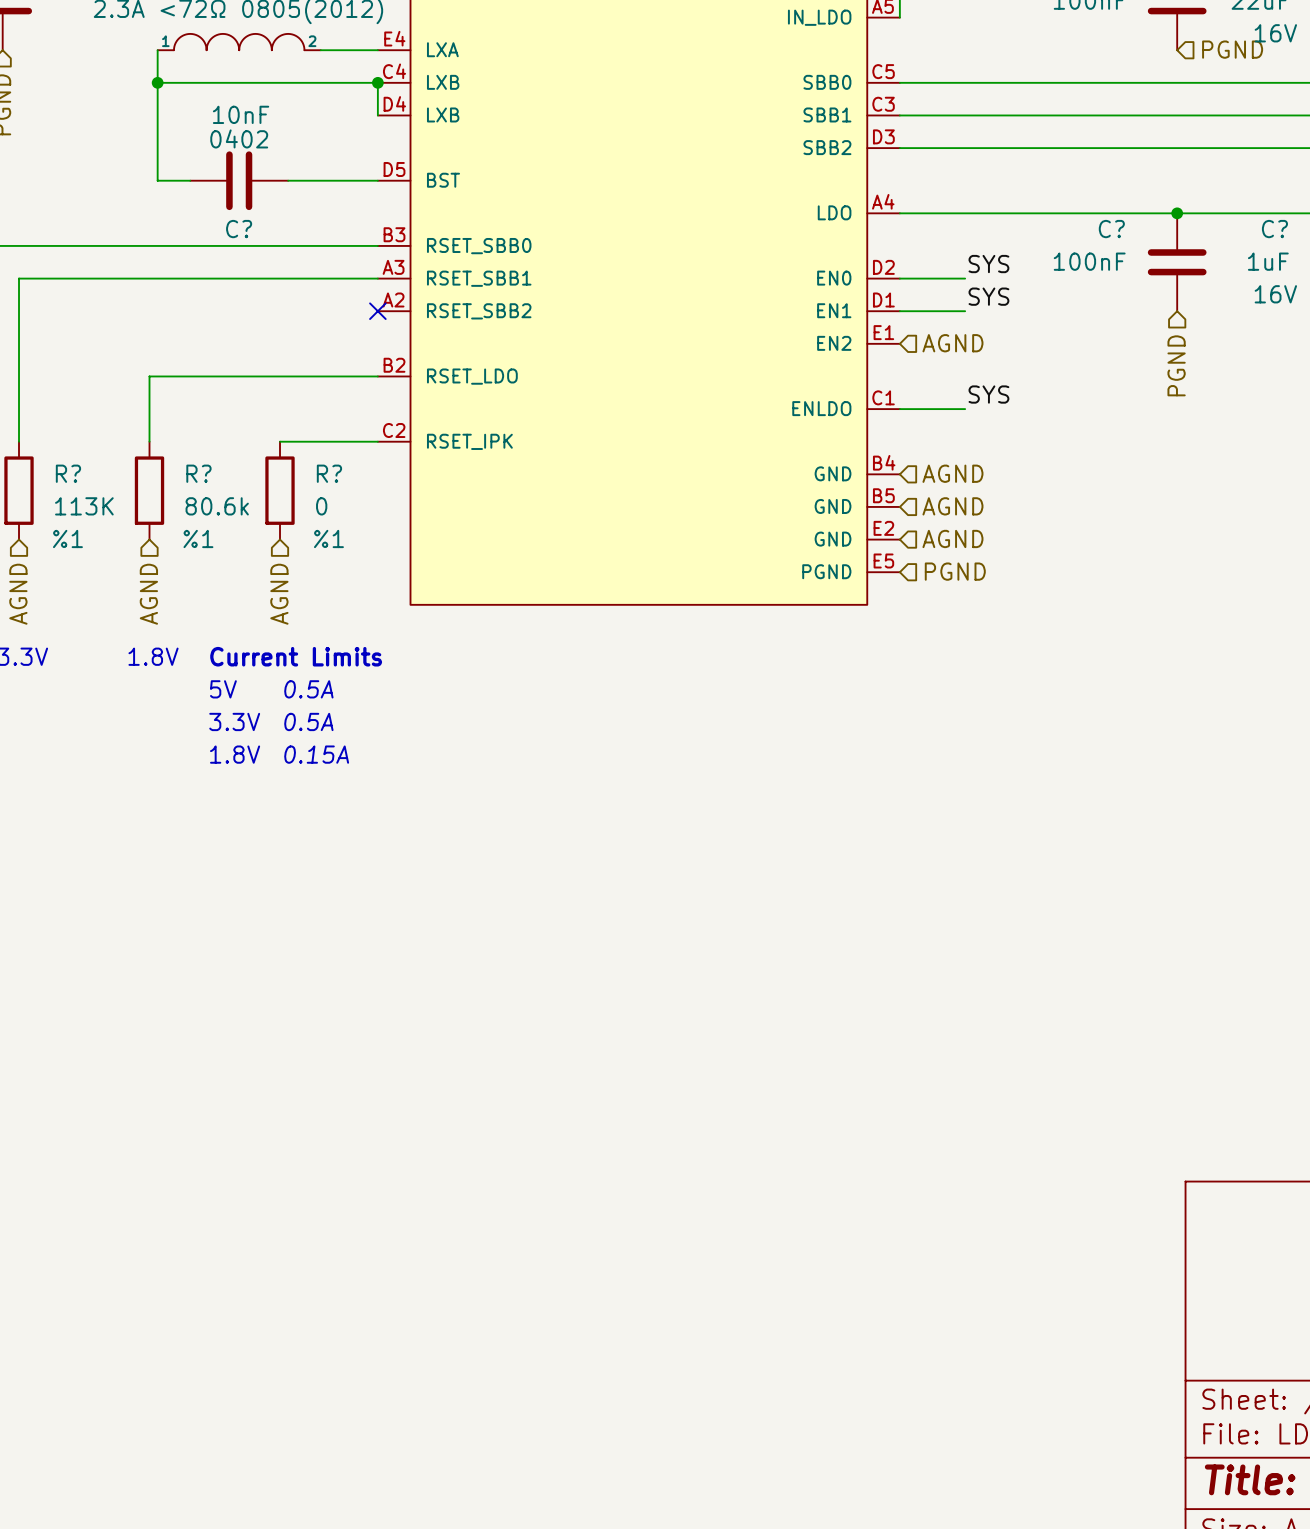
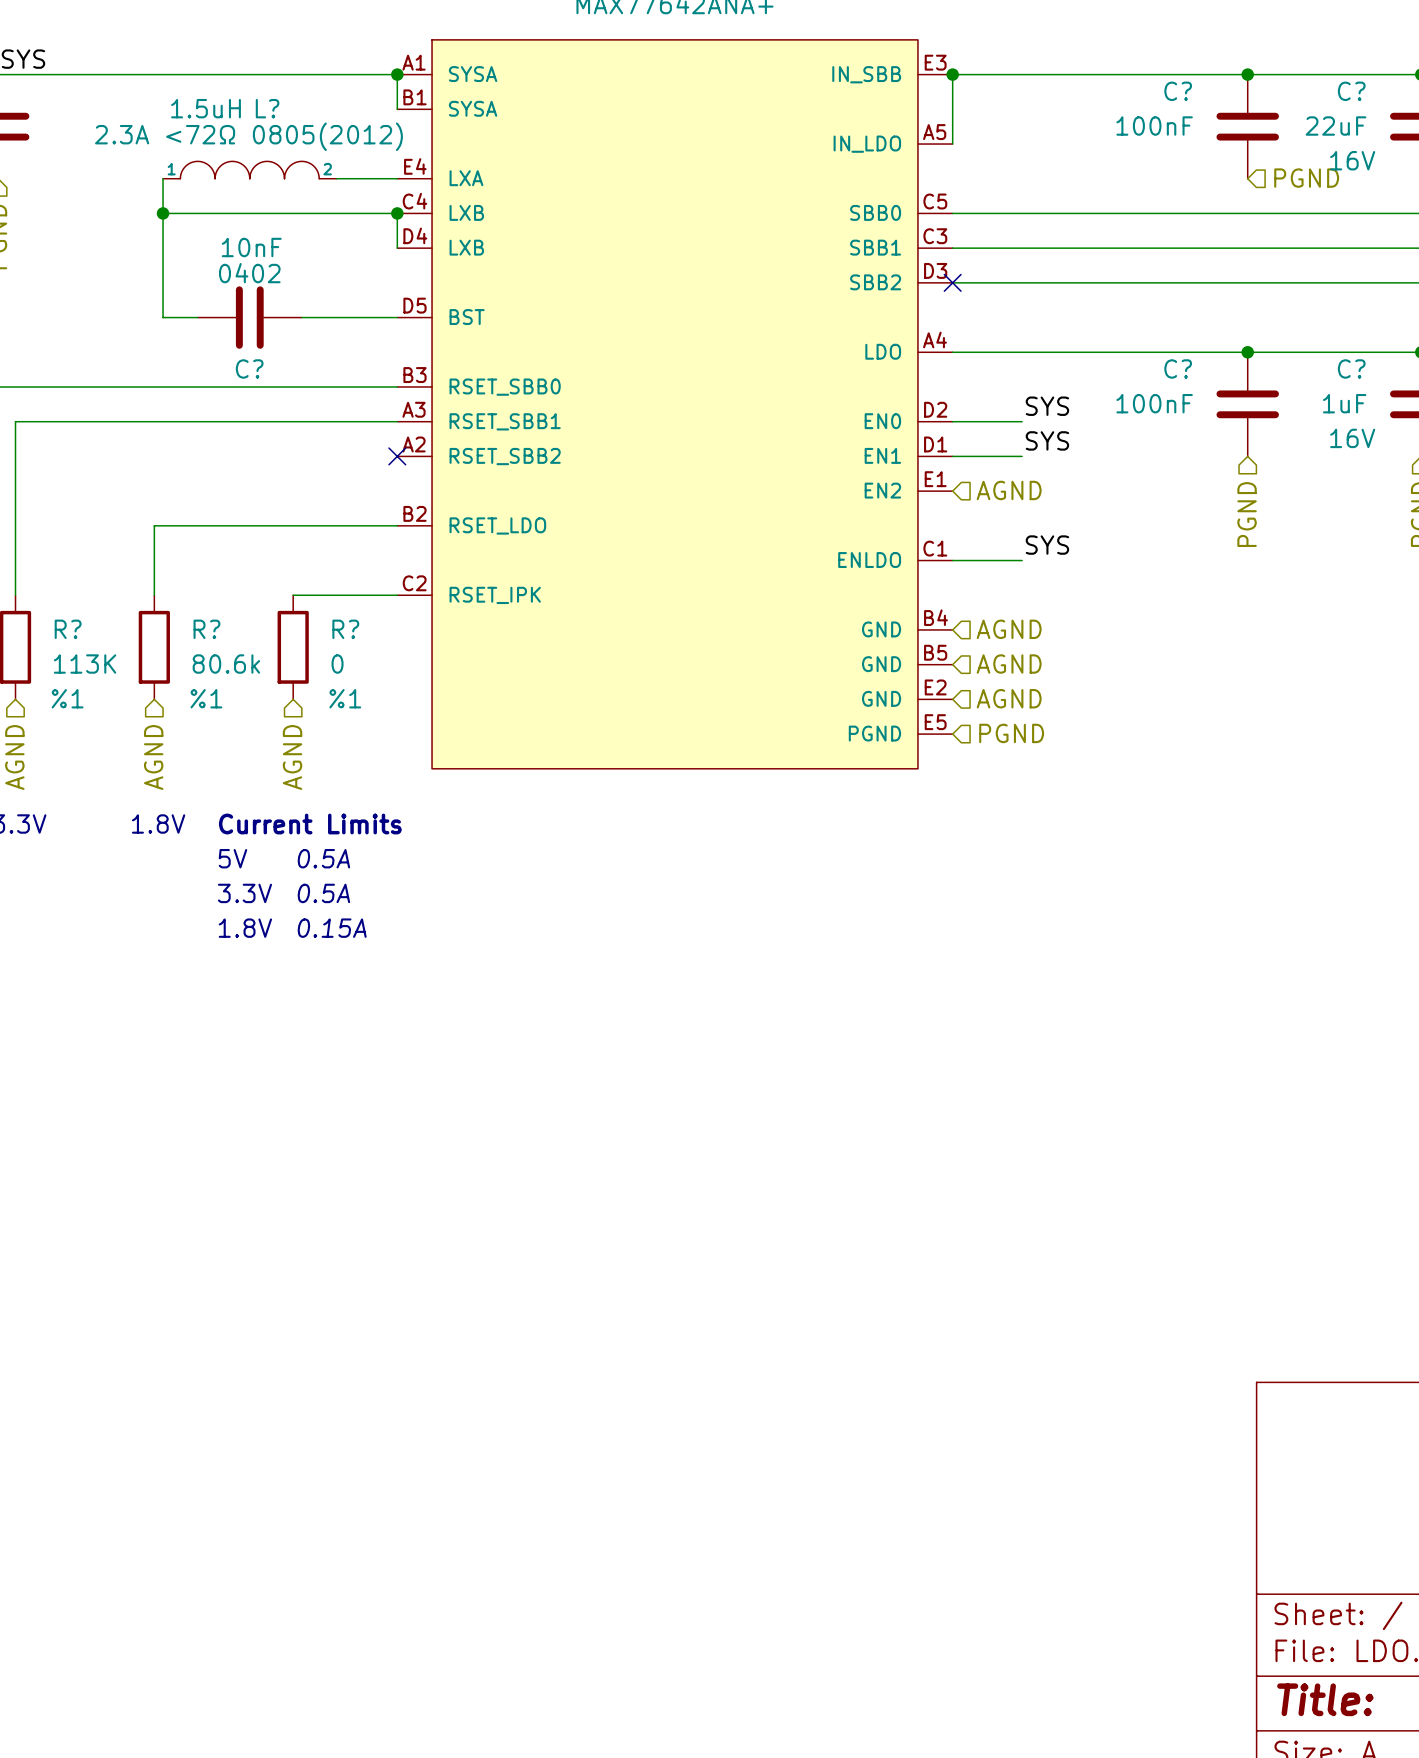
no-connect mark: none -> (952, 282)

